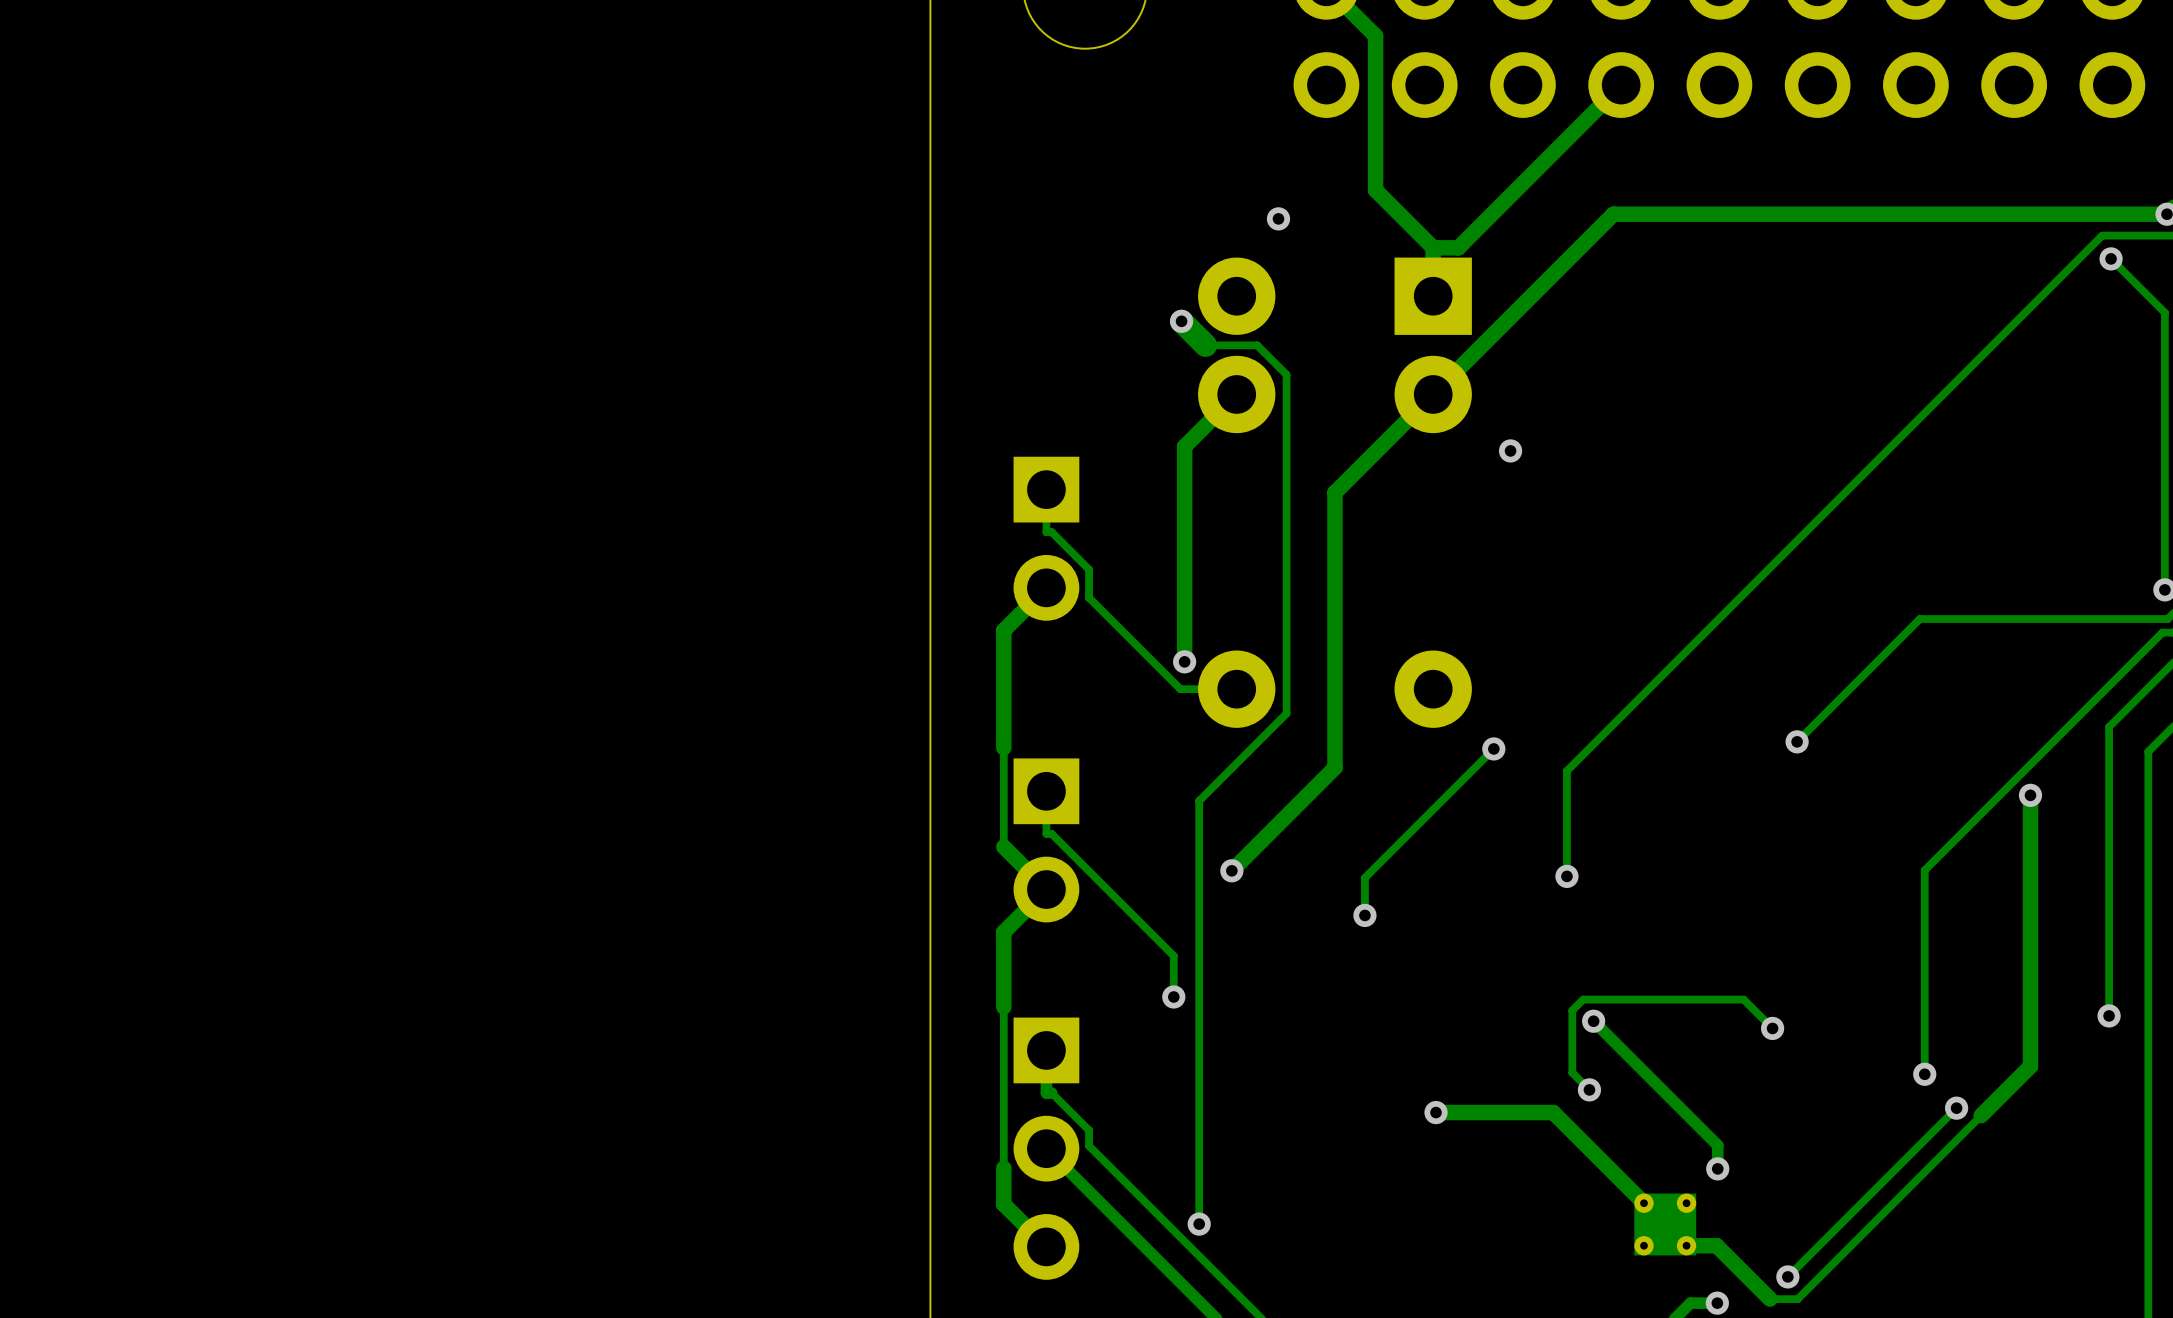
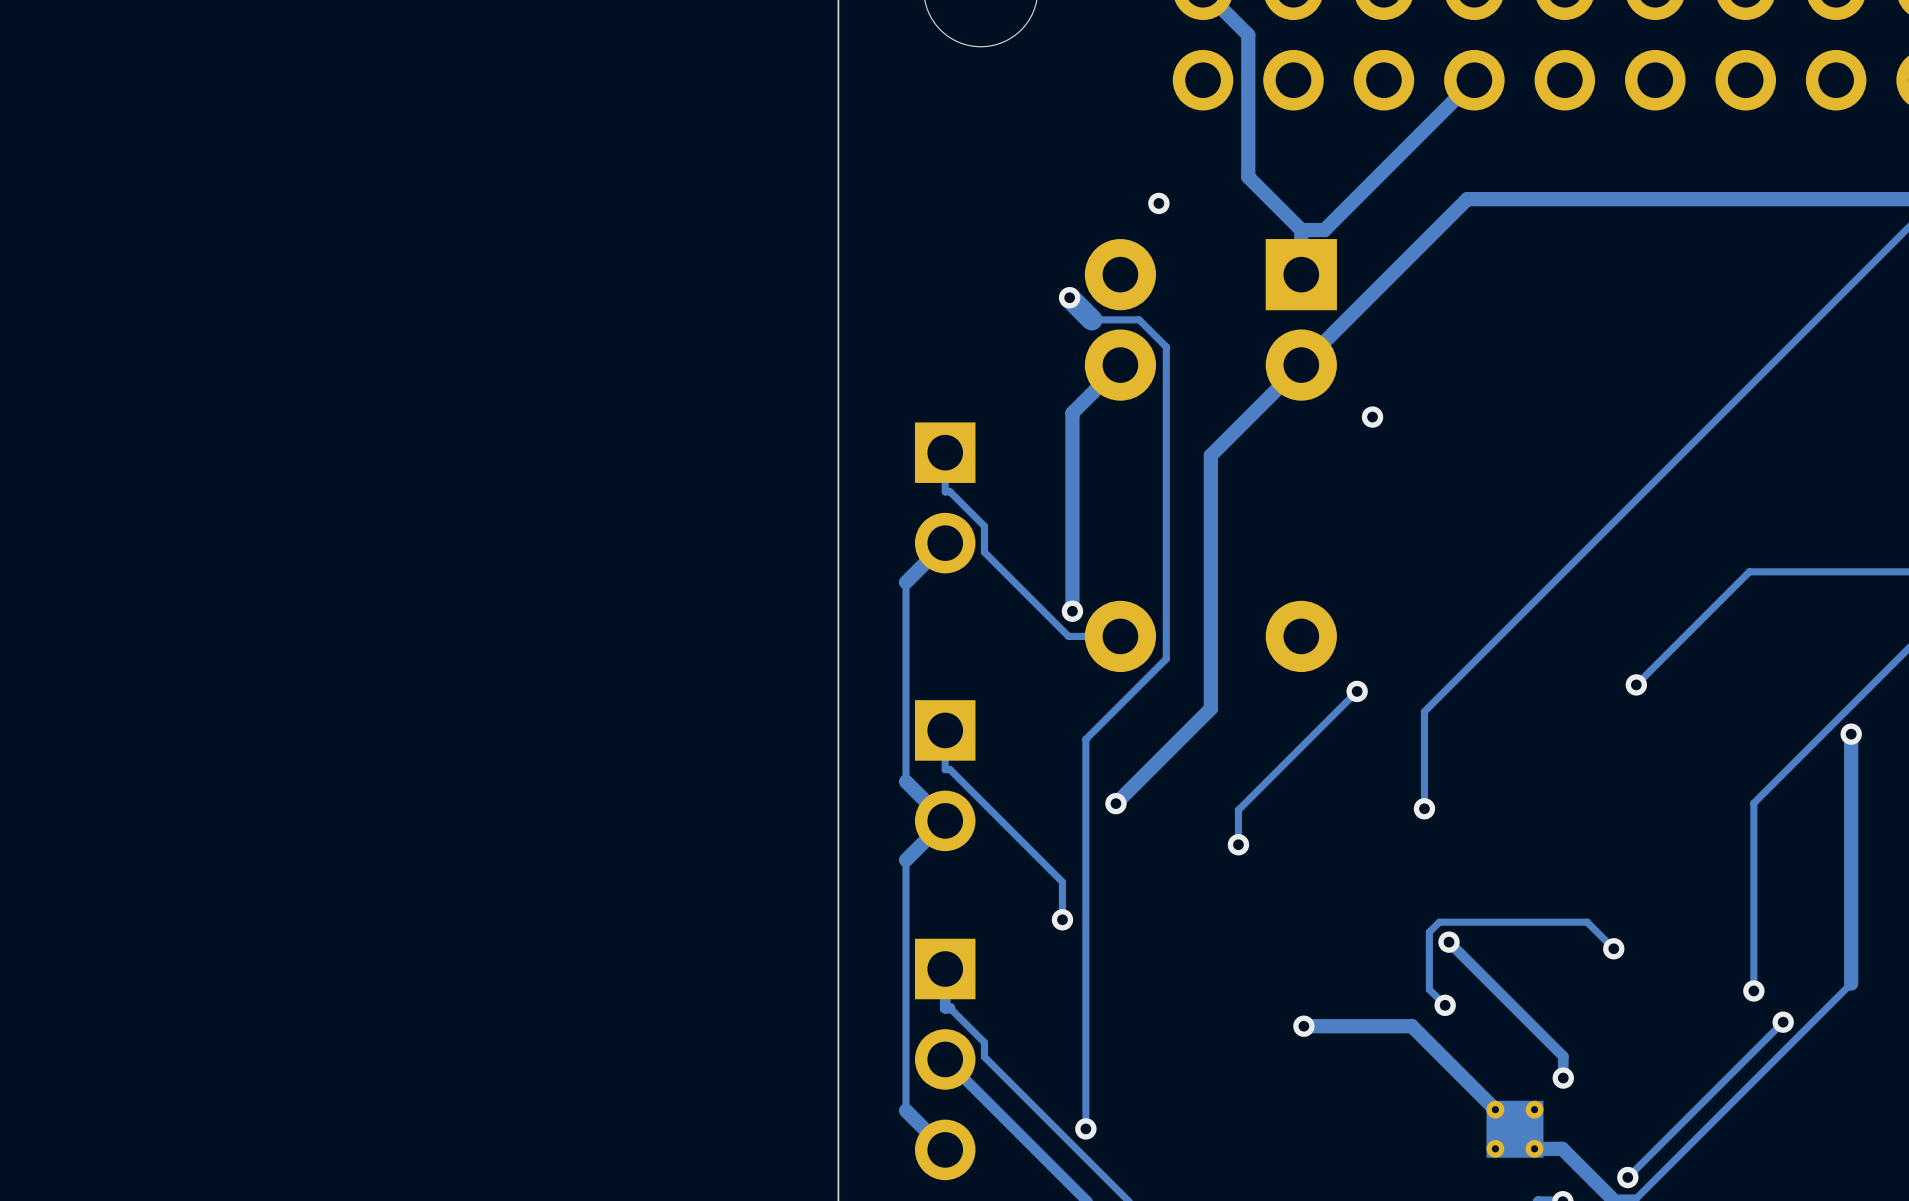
track width: thick (1003, 630) (1003, 747) -> thin (906, 582) (906, 690)
track width: thick (1003, 932) (1003, 1007) -> thin (906, 860) (906, 929)
track width: thick (2030, 1066) (1981, 1115) -> thin (1851, 983) (1805, 1029)
track width: thick (1003, 1168) (1003, 1204) -> thin (906, 1077) (906, 1110)

